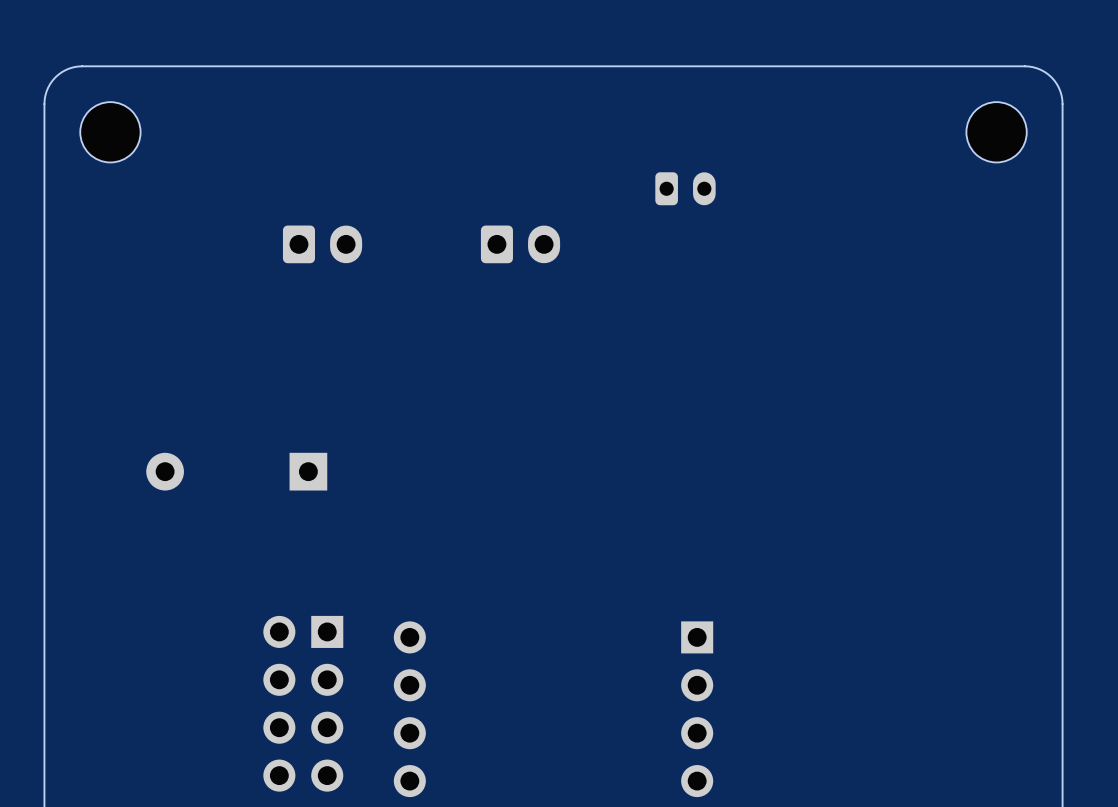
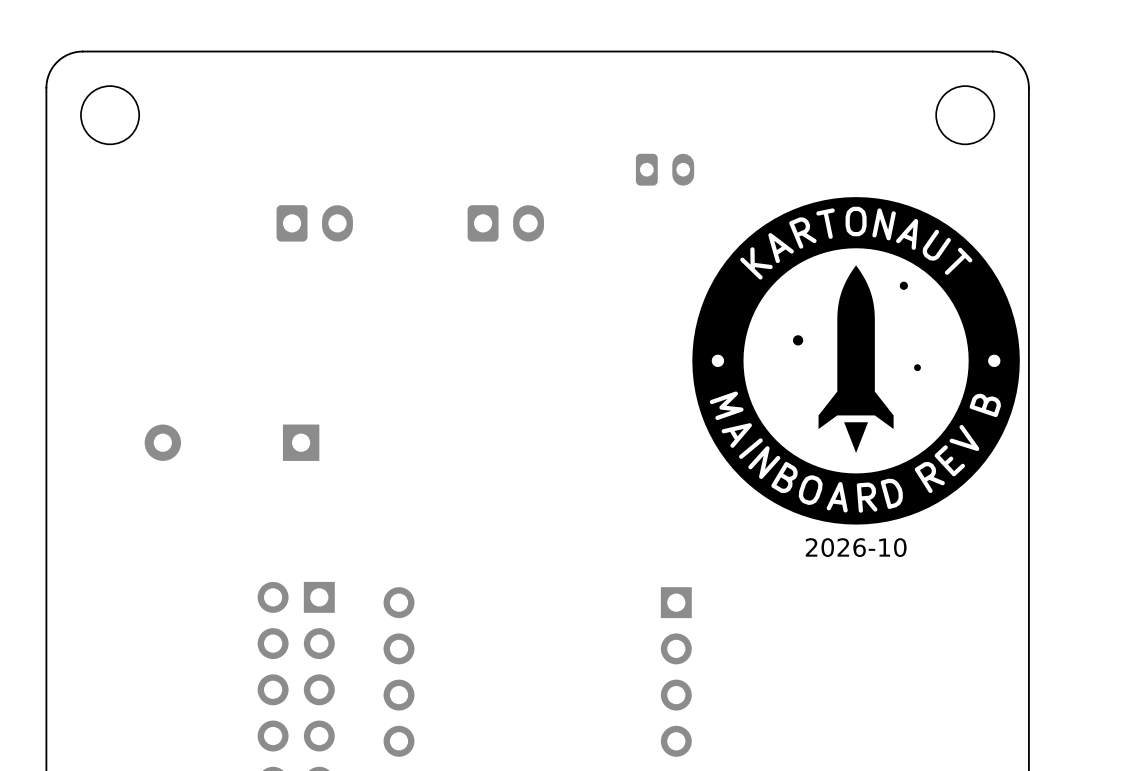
drawing: none -> [692, 197, 1020, 525]
text: none -> 2026-10 (856, 547)

